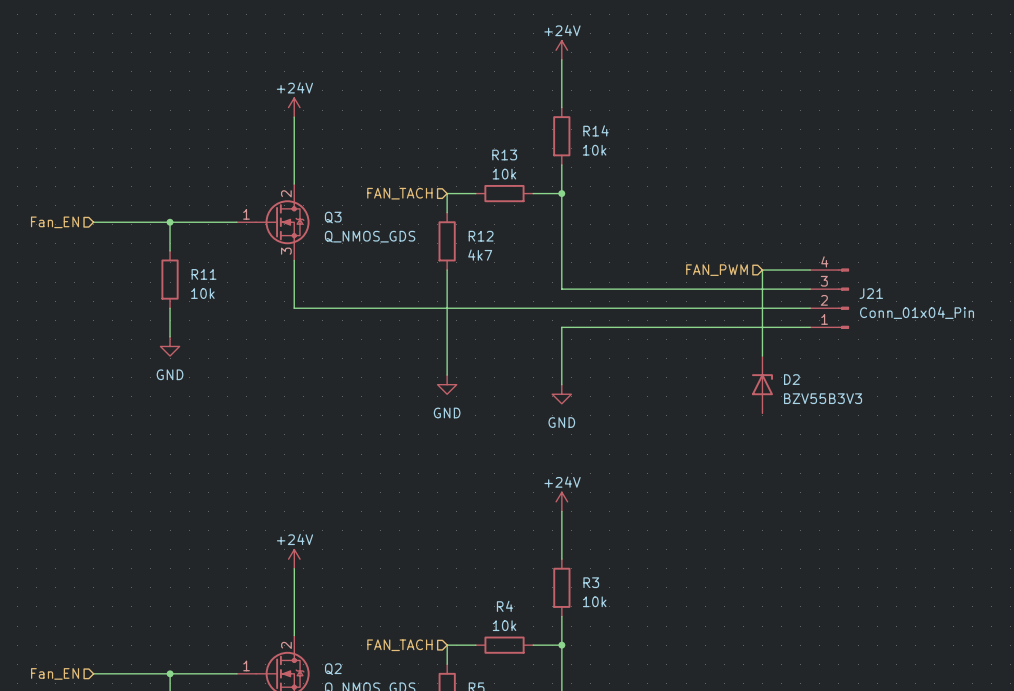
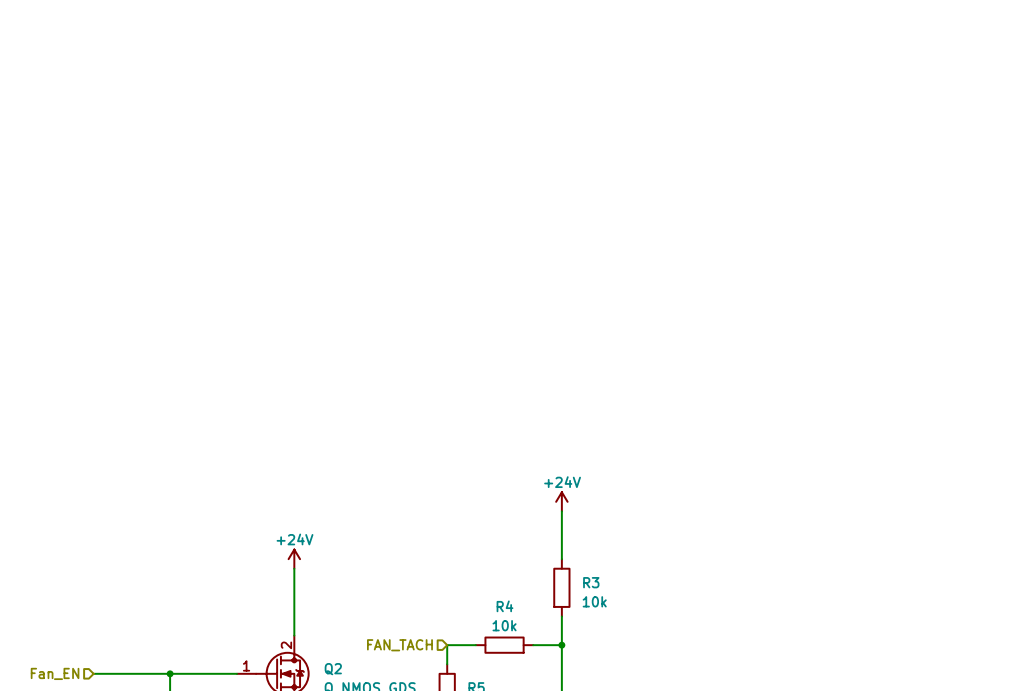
power symbol: +24V (561, 50) -> none
wire: (561, 59) (561, 107) -> none
power symbol: +24V (294, 107) -> none
wire: (294, 117) (294, 184) -> none
R14: 10k (561, 136) -> none
wire: (561, 164) (561, 289) (810, 289) -> none
hierarchical label: FAN_TACH (399, 193) -> none
wire: (475, 193) (447, 193) (447, 212) -> none
R13: 10k (504, 193) -> none
wire: (533, 193) (561, 193) -> none
junction: (561, 193) -> none
hierarchical label: Fan_EN (54, 222) -> none
wire: (93, 222) (236, 222) -> none
wire: (170, 222) (170, 250) -> none
junction: (170, 222) -> none
Q3: Q_NMOS_GDS (273, 222) -> none
R12: 4k7 (447, 241) -> none
wire: (294, 260) (294, 308) (810, 308) -> none
wire: (447, 270) (447, 375) -> none
hierarchical label: FAN_PWM (717, 270) -> none
wire: (810, 270) (762, 270) (762, 356) -> none
R11: 10k (170, 279) -> none
J21: Conn_01x04_Pin (829, 298) -> none
wire: (170, 308) (170, 336) -> none
wire: (810, 327) (561, 327) (561, 384) -> none
power symbol: GND (170, 346) -> none
power symbol: GND (447, 384) -> none
D2: BZV55B3V3 (762, 384) -> none
power symbol: GND (561, 394) -> none

